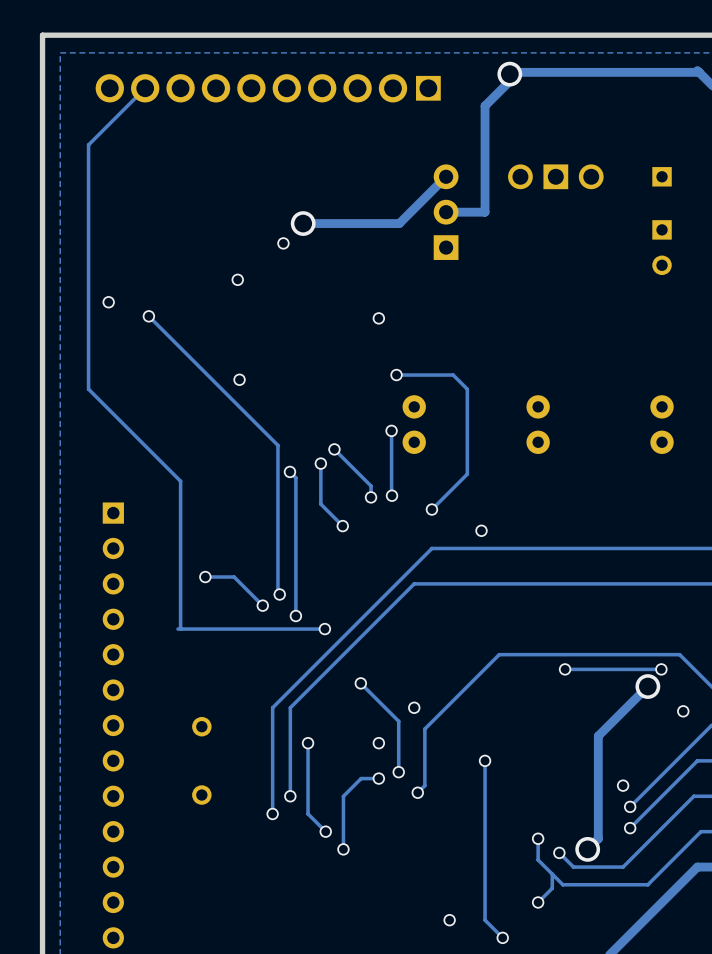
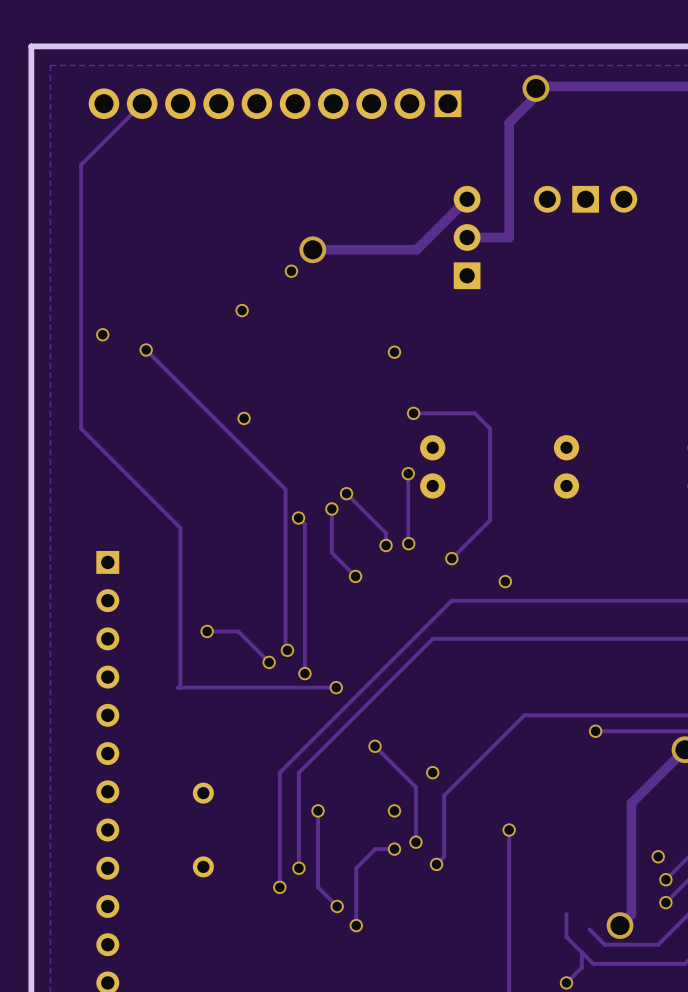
via: (538, 838) -> none
via: (559, 852) -> none

